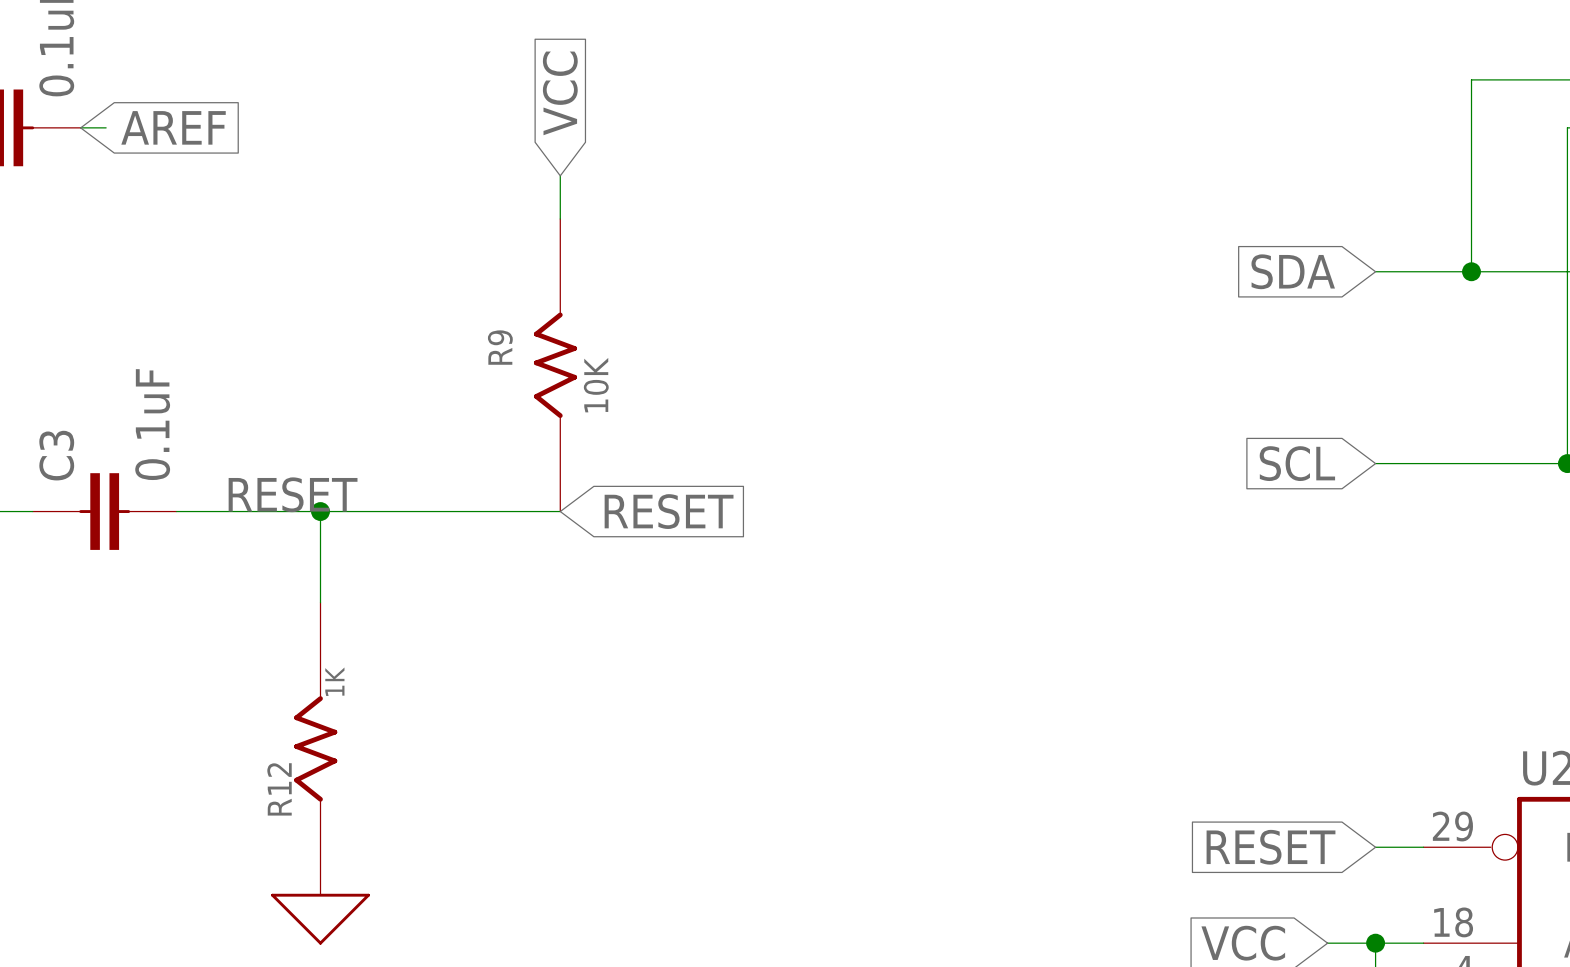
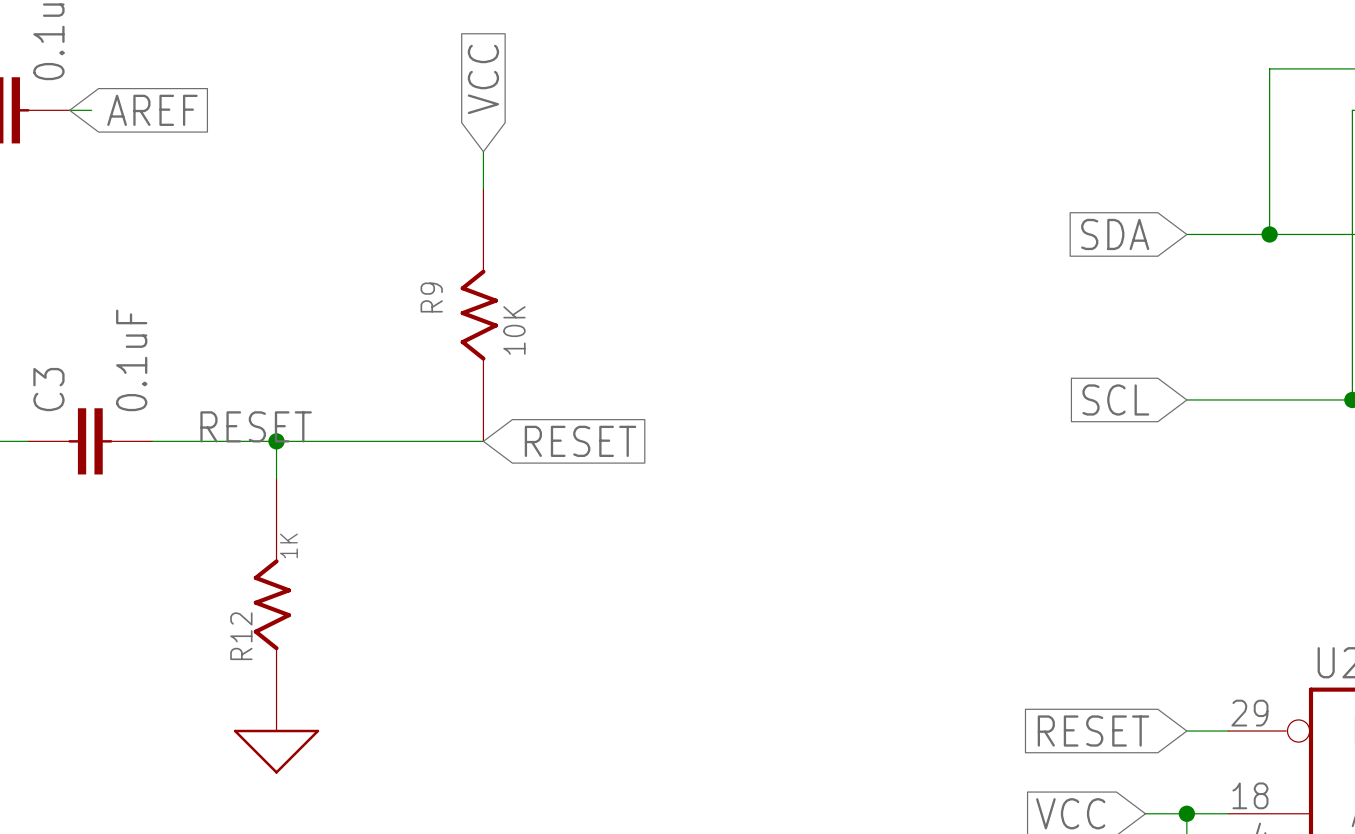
R12 position: (315, 748) -> (272, 604)
power symbol position: (320, 919) -> (276, 751)

